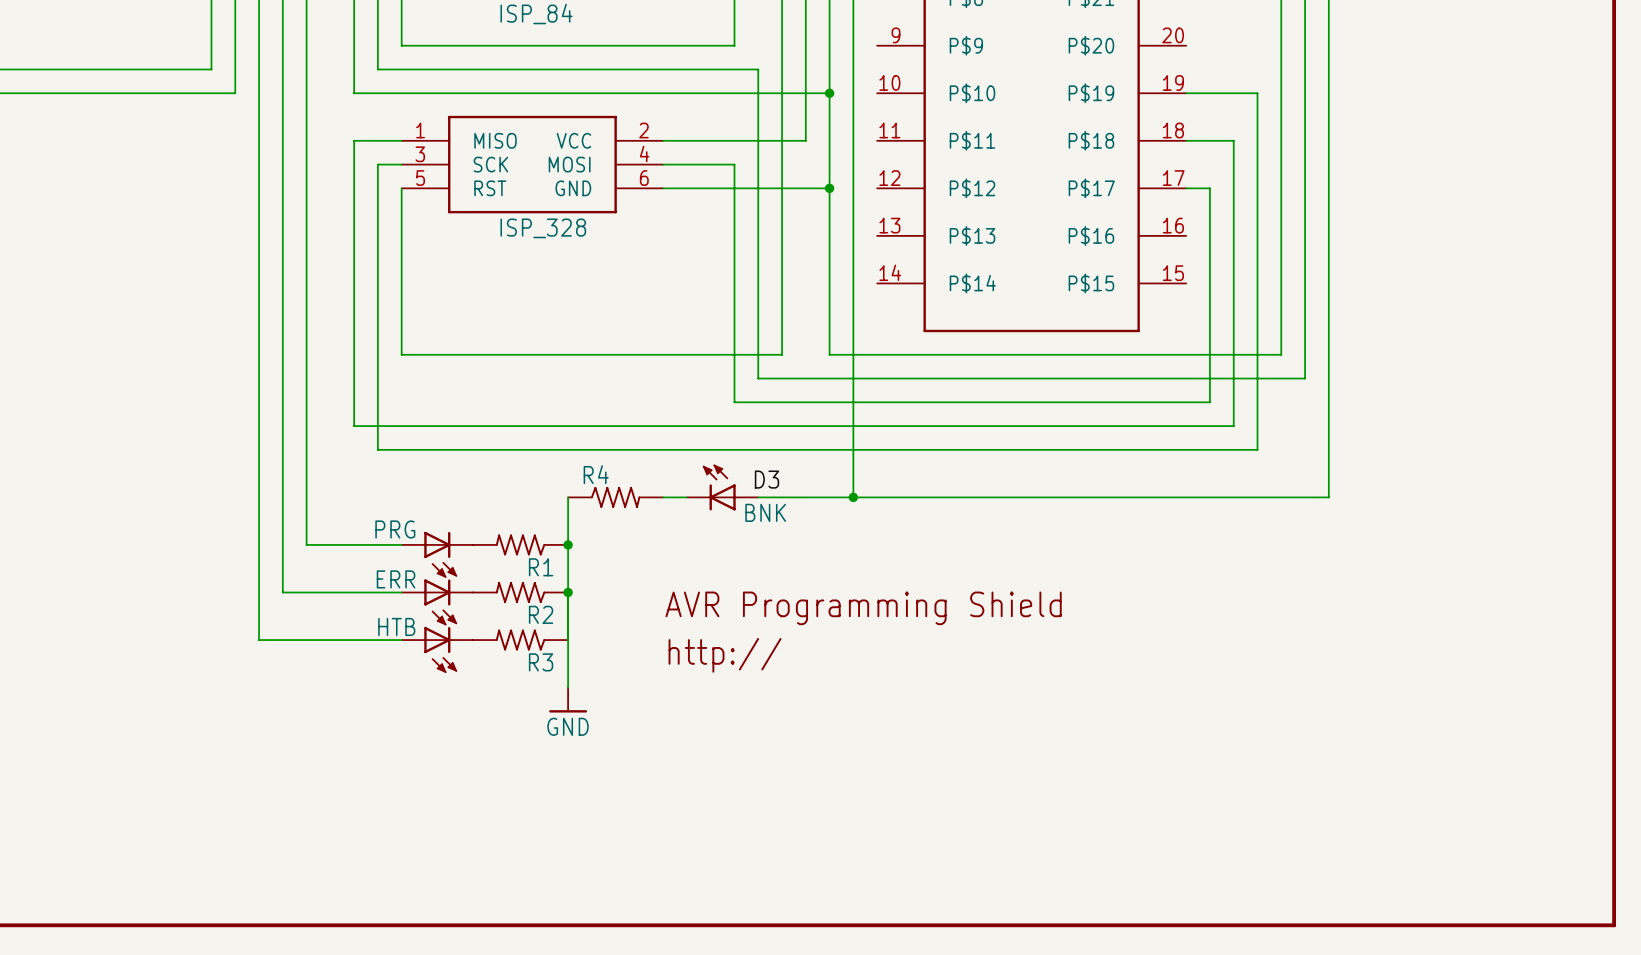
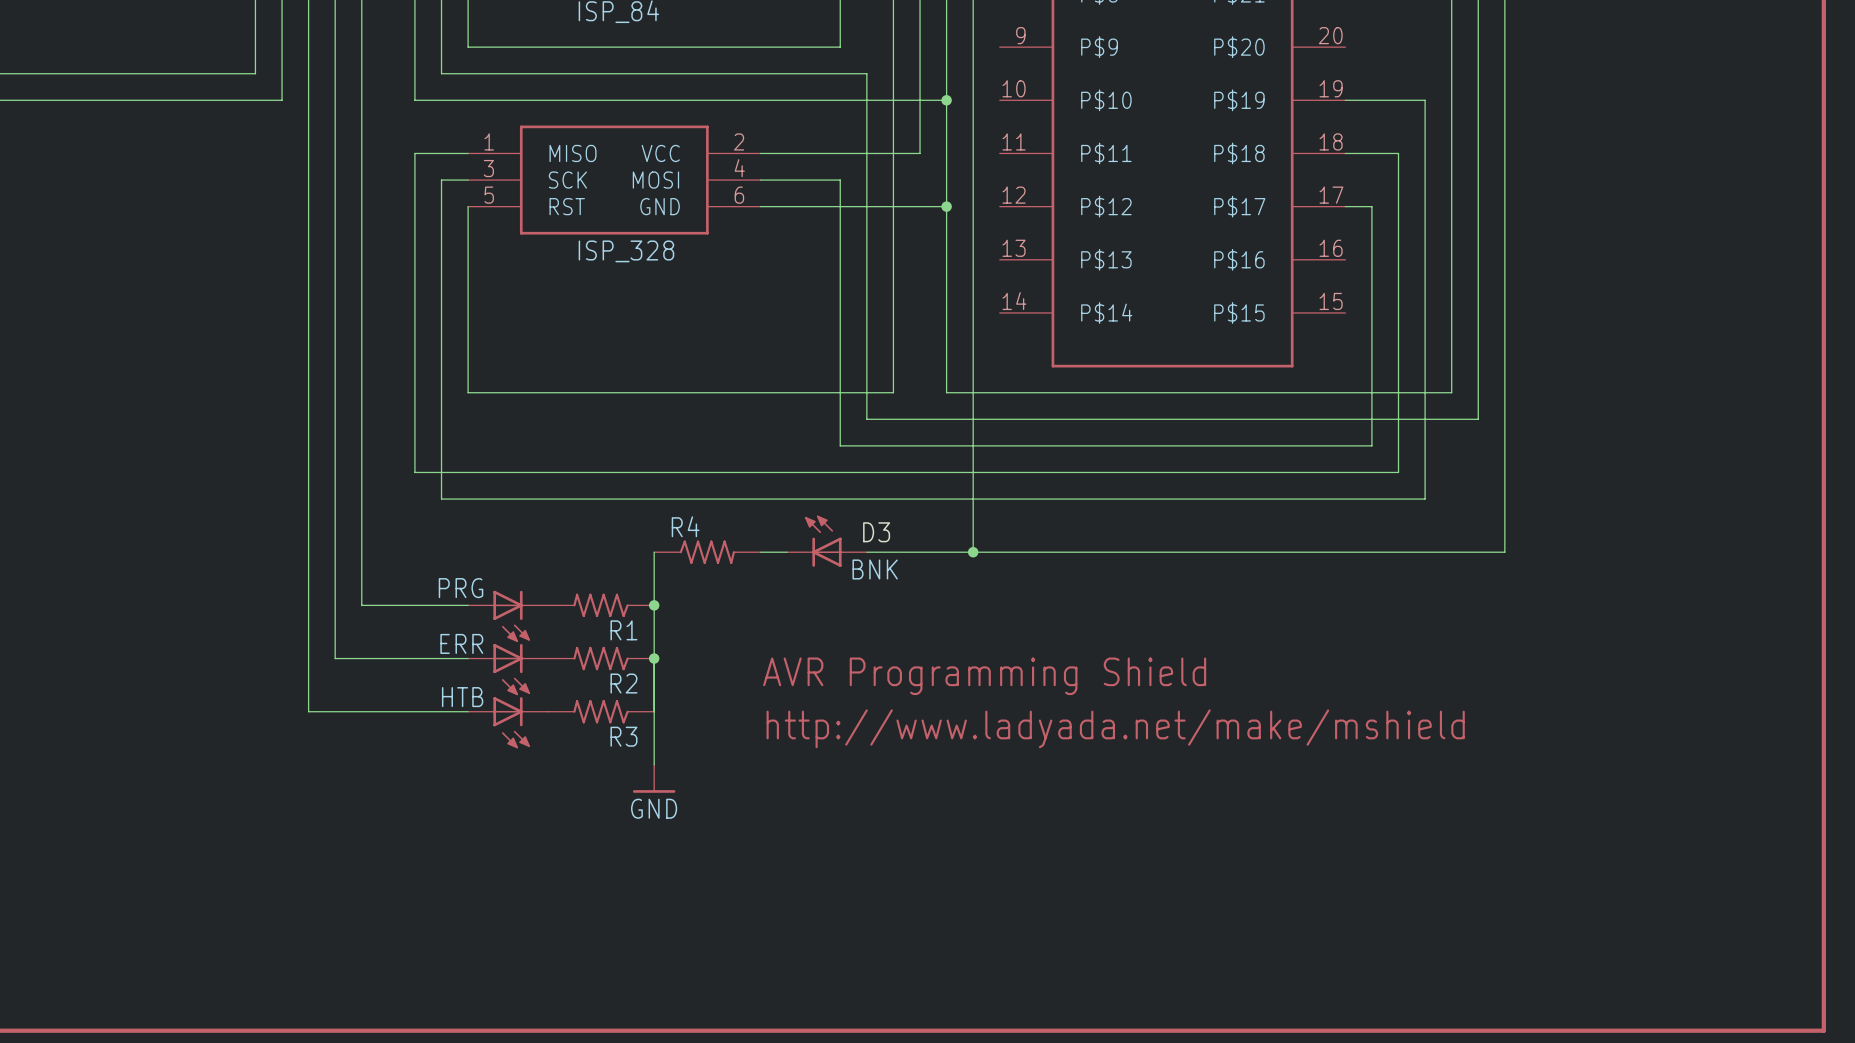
text: http:// (725, 655) -> http://www.ladyada.net/make/mshield (1115, 728)

